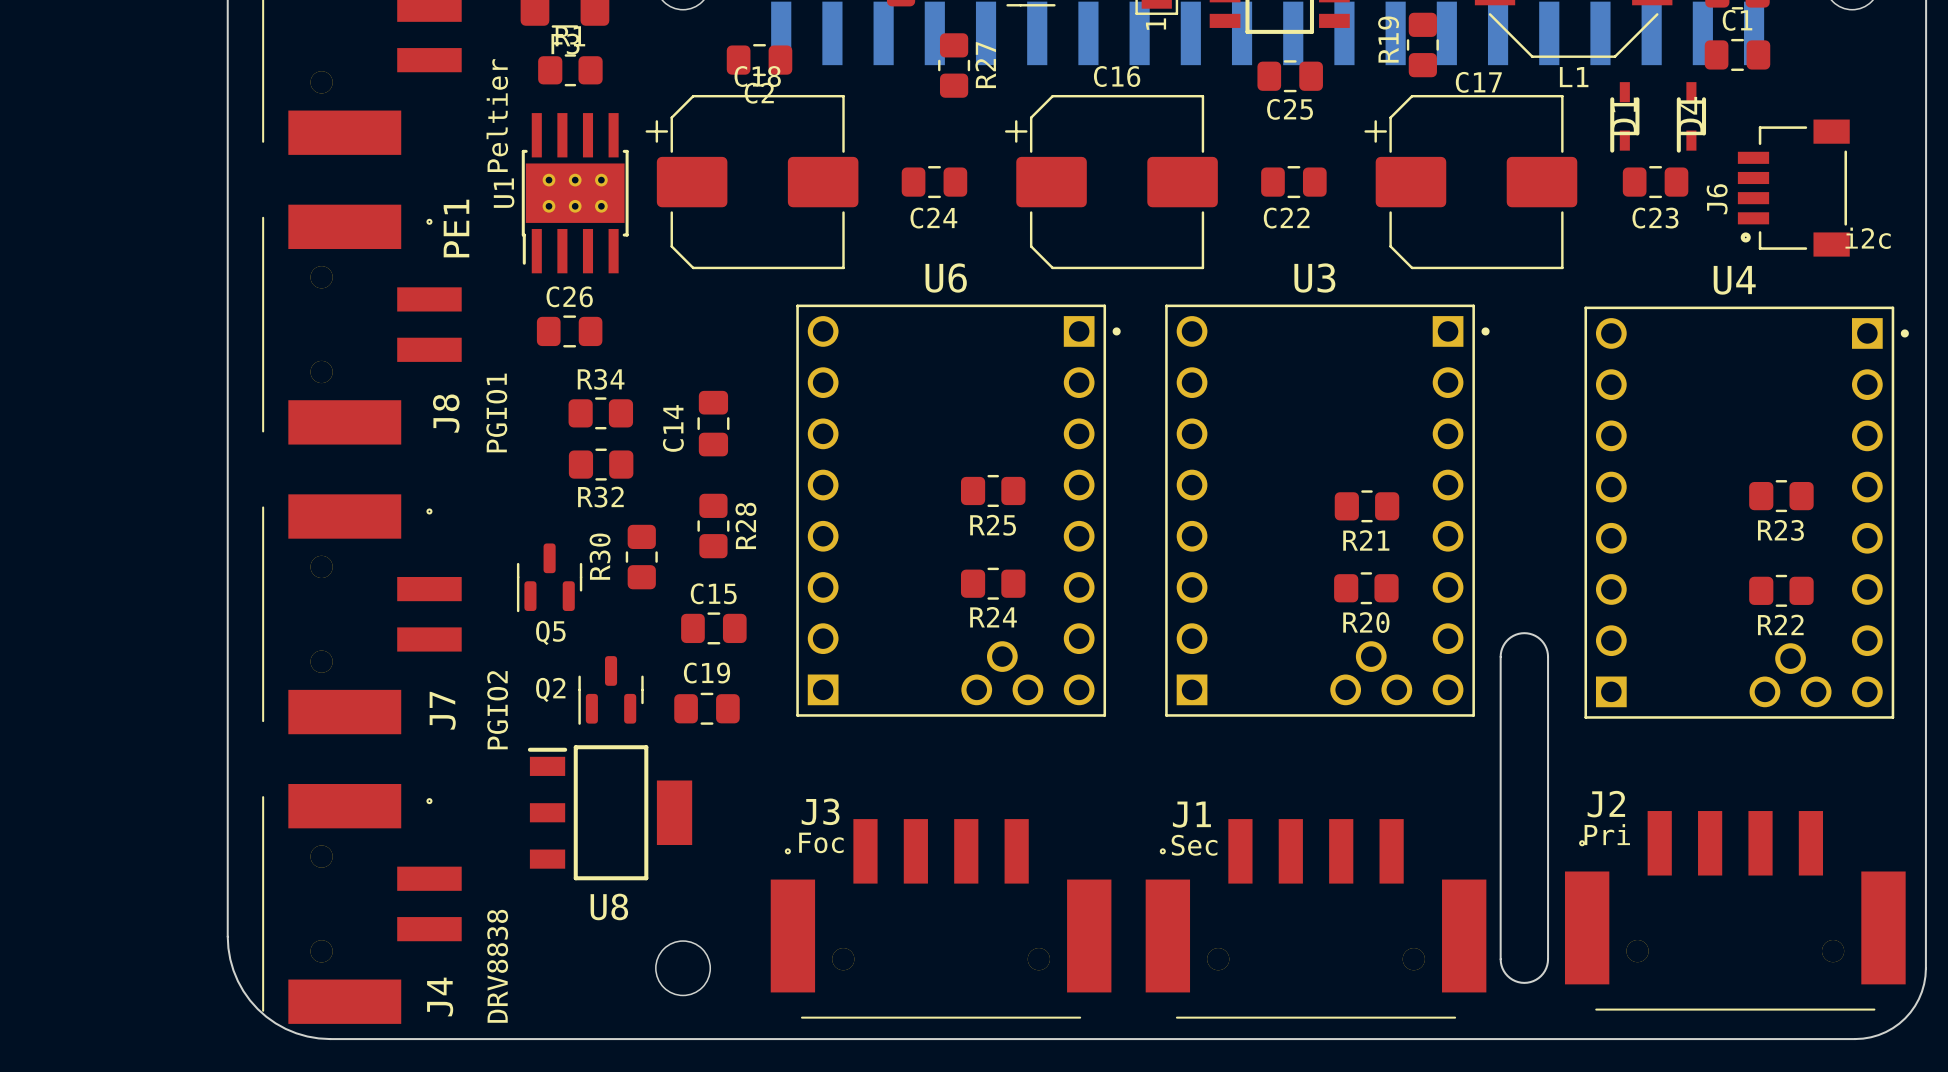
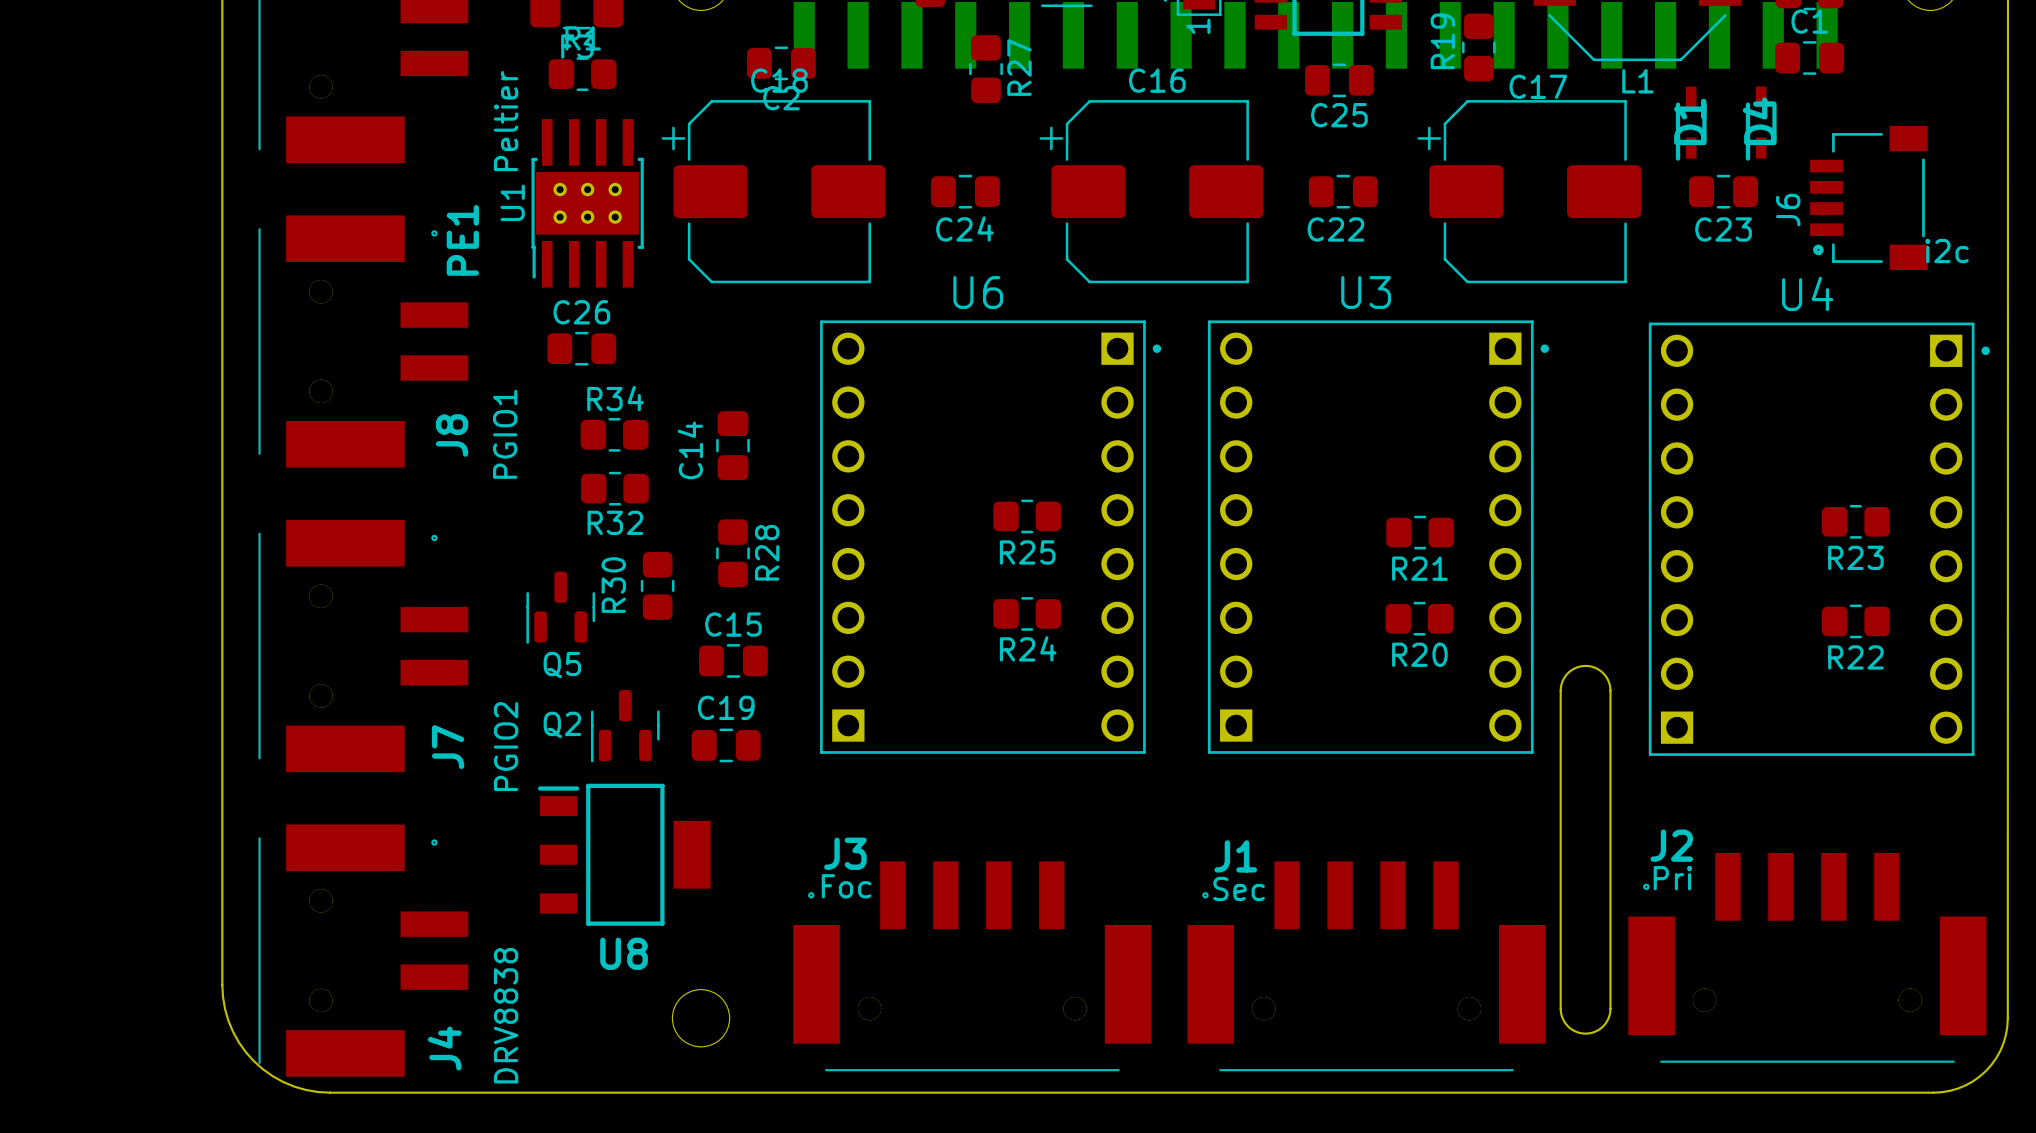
U6 footprint: [796, 304, 1121, 717] -> [820, 320, 1162, 754]
U3 footprint: [1165, 304, 1490, 717] -> [1207, 320, 1550, 754]
U4 footprint: [1584, 306, 1909, 719] -> [1648, 322, 1990, 756]

